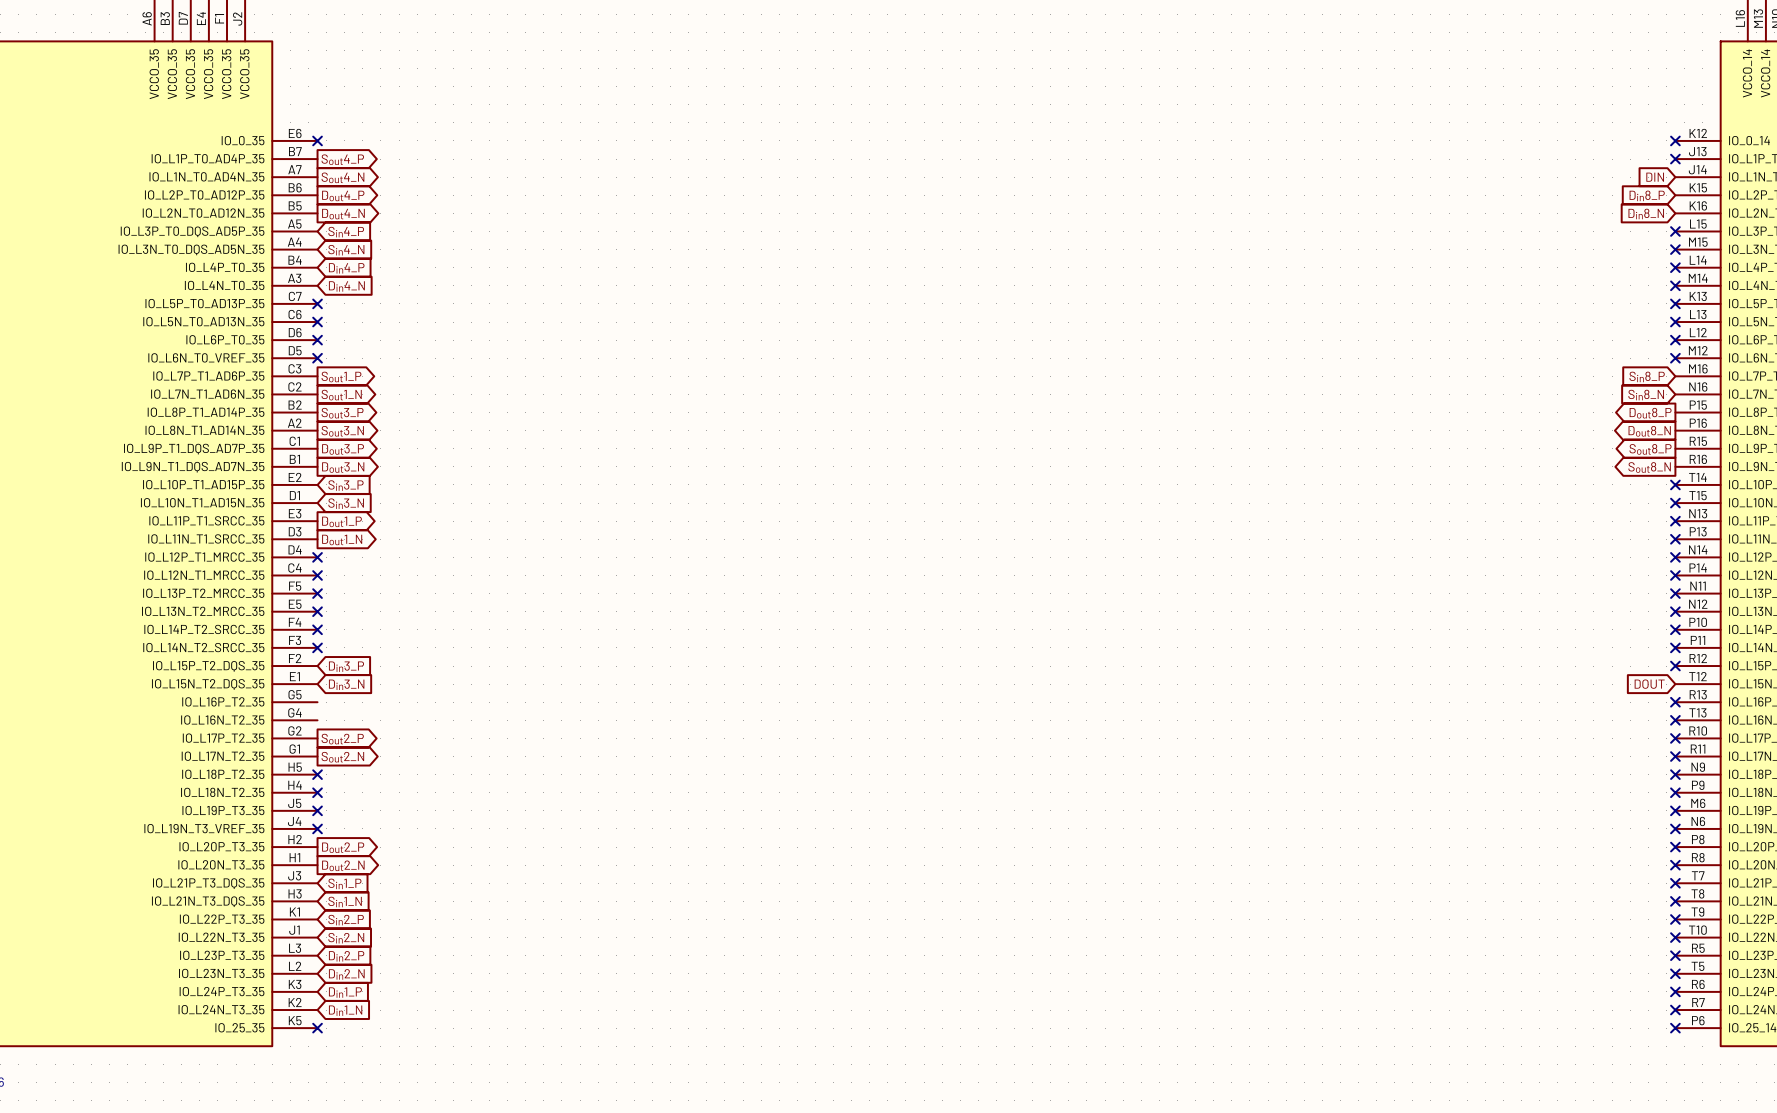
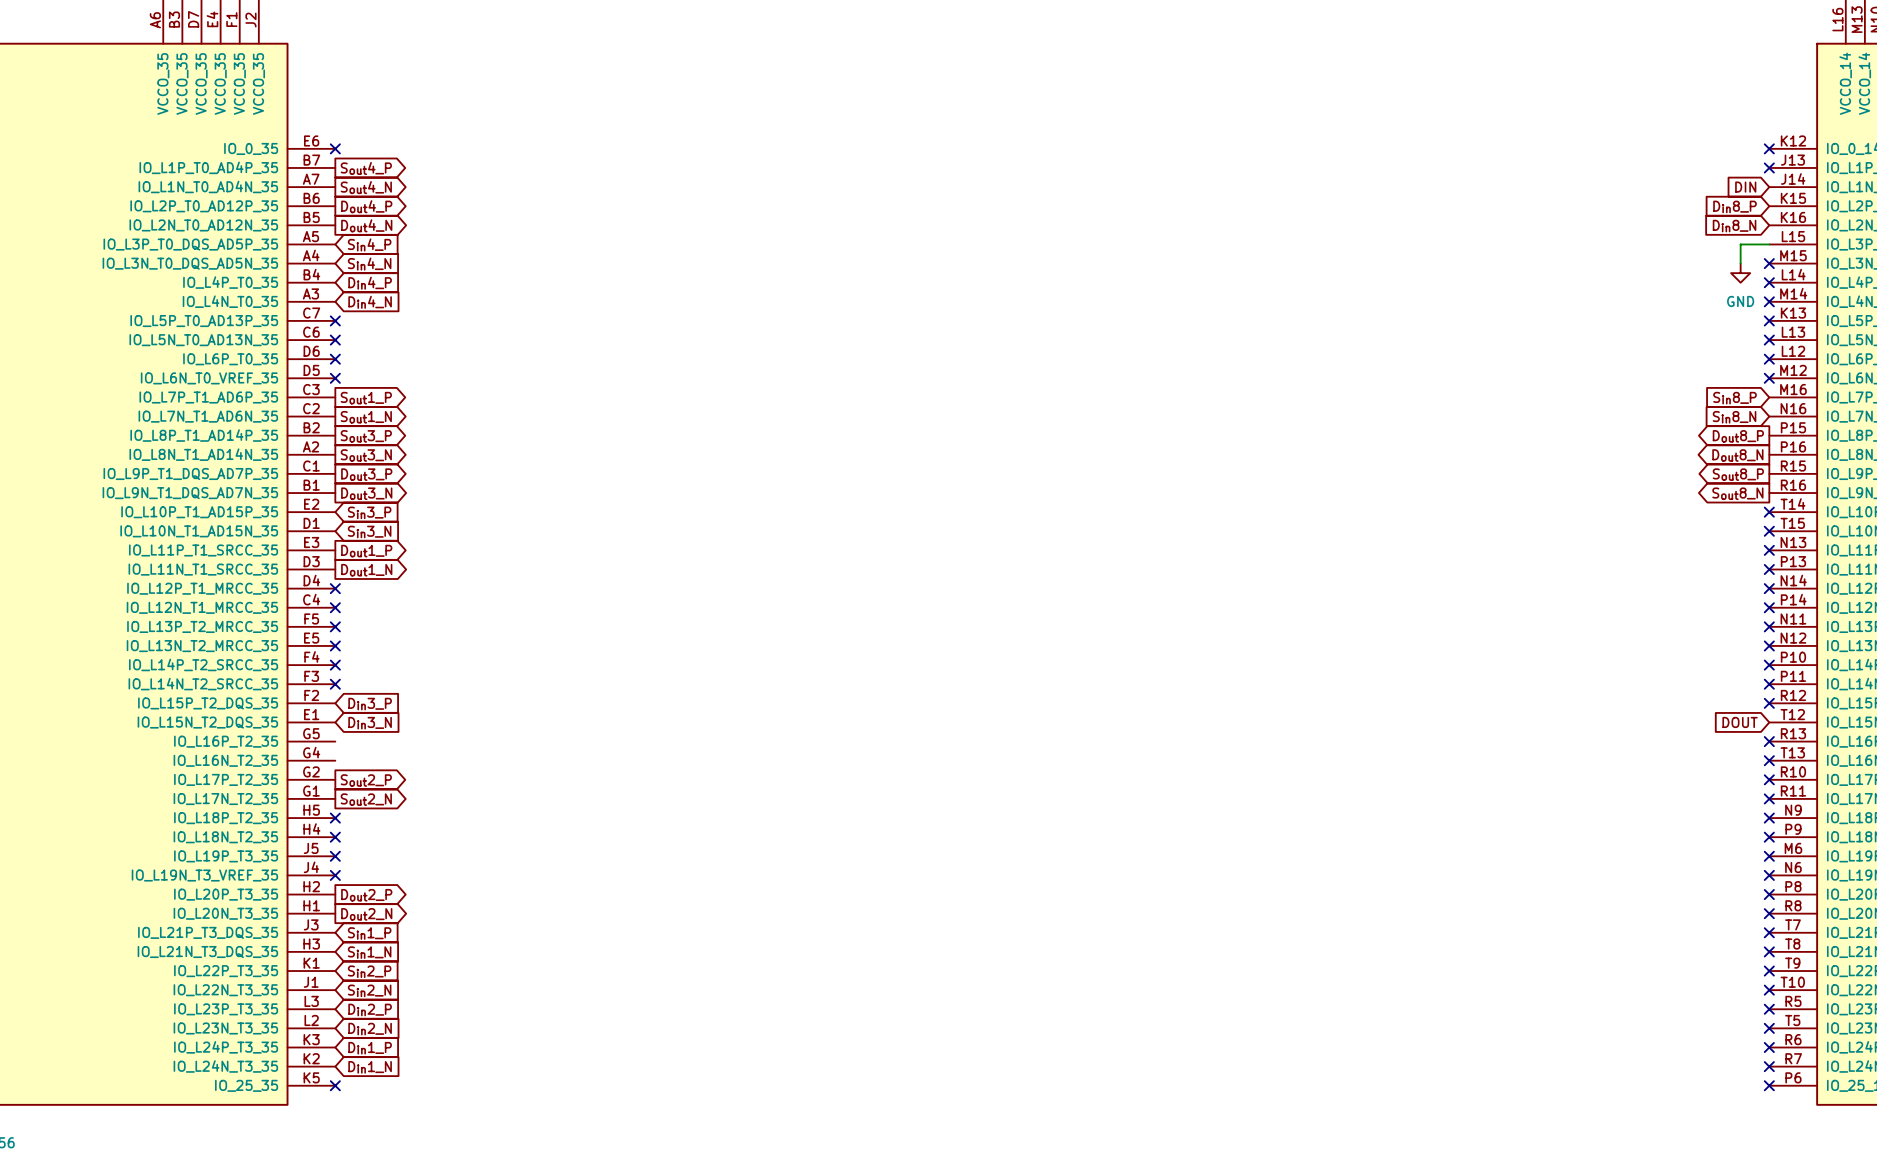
wire: none -> (1769, 244) (1740, 244) (1740, 263)
no-connect mark: (1675, 231) -> none
power symbol: none -> GND (1740, 273)

